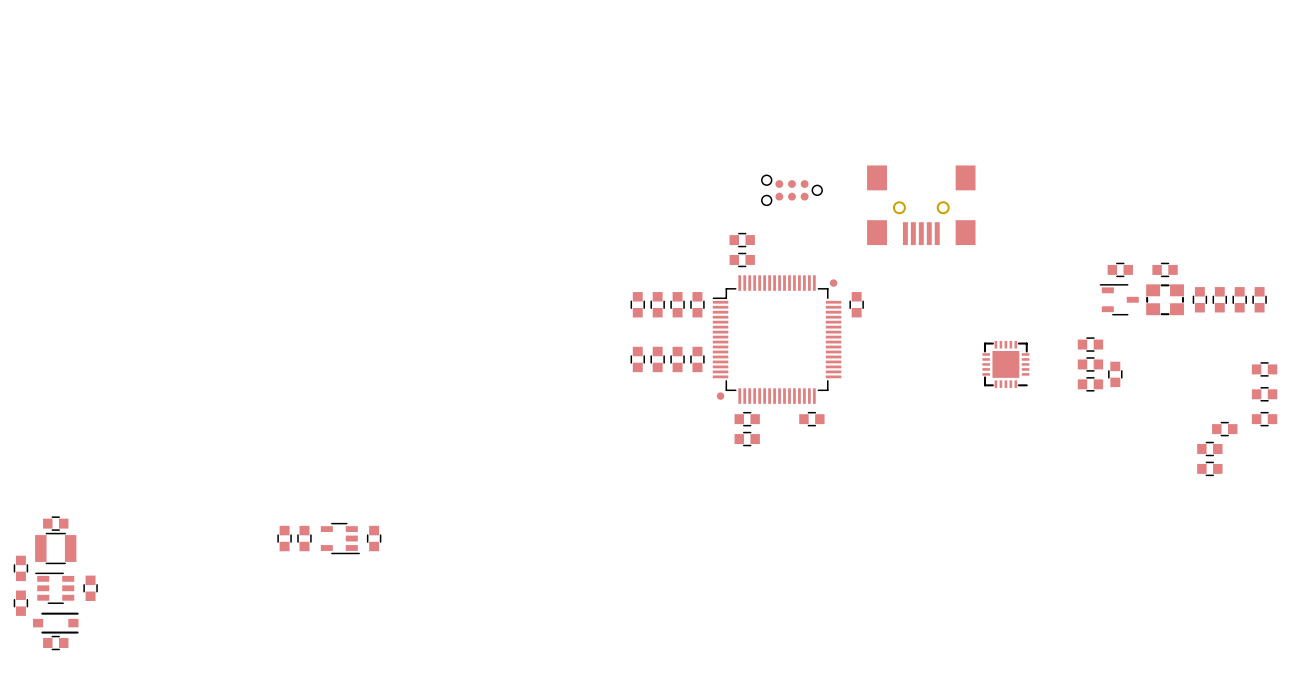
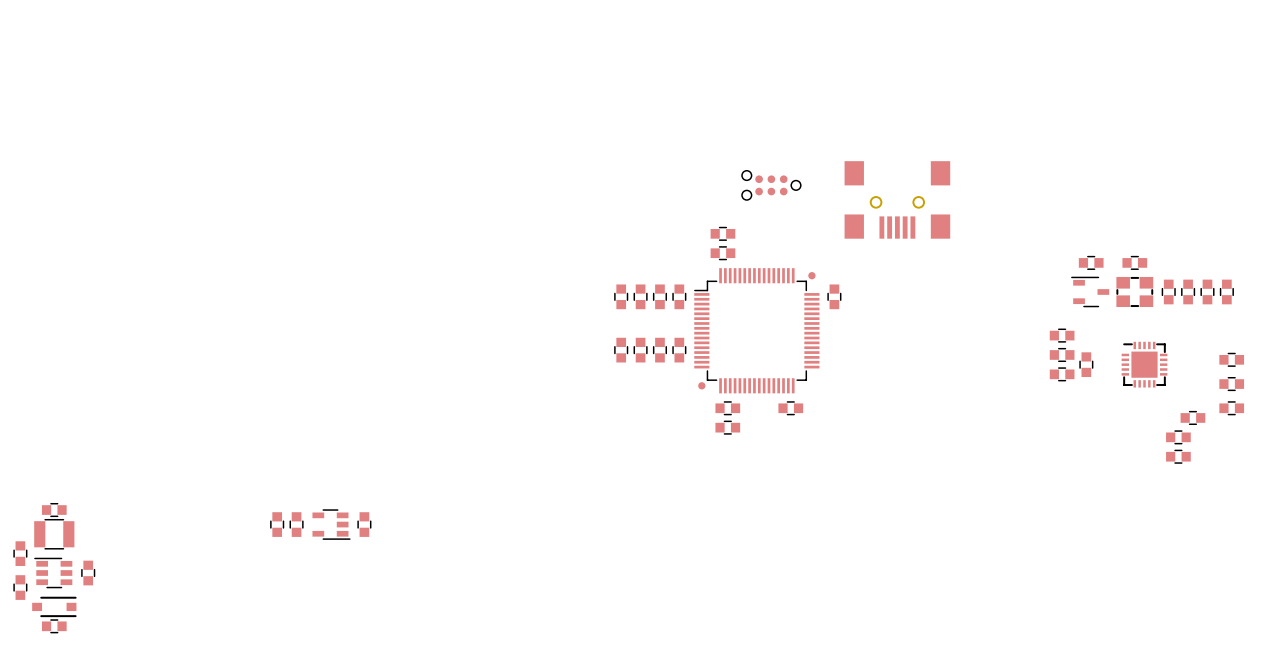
part rotation: 0° (1005, 364) -> 180° (1144, 364)
part position: (1005, 364) -> (1144, 364)

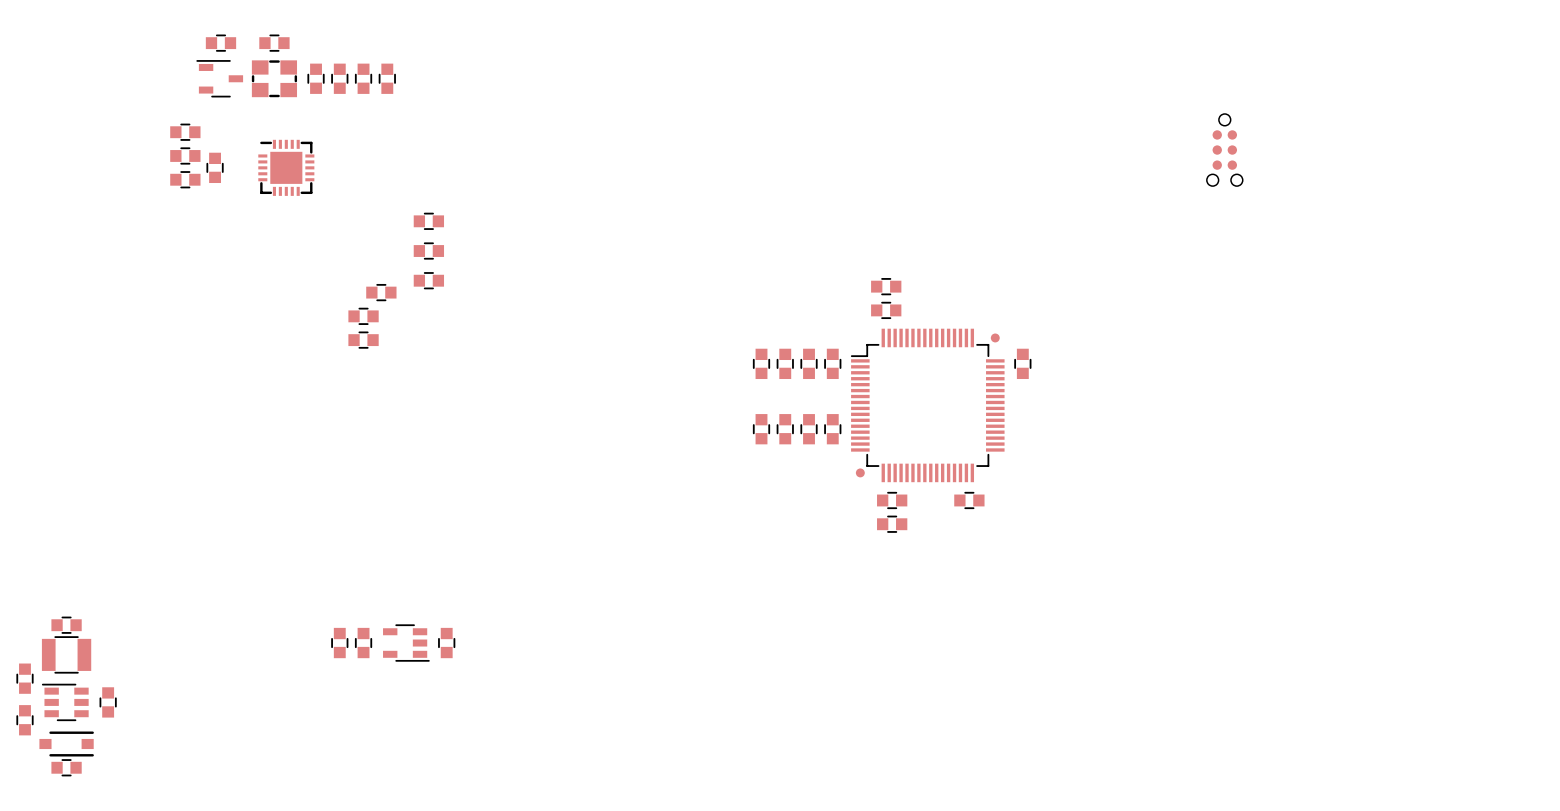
part: none -> (220, 43)
part: none -> (274, 43)
part: none -> (219, 78)
part: none -> (274, 78)
part: none -> (316, 78)
part: none -> (339, 78)
part: none -> (363, 78)
part: none -> (387, 78)
part: none -> (185, 132)
part: none -> (185, 155)
part: none -> (215, 167)
part: none -> (286, 167)
part: none -> (185, 179)
part: none -> (428, 221)
part rotation: 0° (771, 185) -> 90° counterclockwise (1224, 150)
part position: (771, 185) -> (1224, 150)
part: (897, 199) -> none
part: none -> (428, 251)
part: none -> (428, 280)
part: none -> (381, 292)
part: none -> (363, 316)
part: (1091, 262) -> none
part: (1134, 262) -> none
part: none -> (363, 340)
part: (1090, 291) -> none
part: (1134, 291) -> none
part: (1168, 291) -> none
part: (1188, 291) -> none
part: (1207, 291) -> none
part: (1226, 291) -> none
part: (1062, 335) -> none
part: (1062, 354) -> none
part: (1231, 359) -> none
part: (1086, 364) -> none
part: (1144, 364) -> none
part: (1062, 374) -> none
part: (1231, 384) -> none
part: (1231, 408) -> none
part: (1192, 417) -> none
part: (1178, 437) -> none
part: (1178, 456) -> none

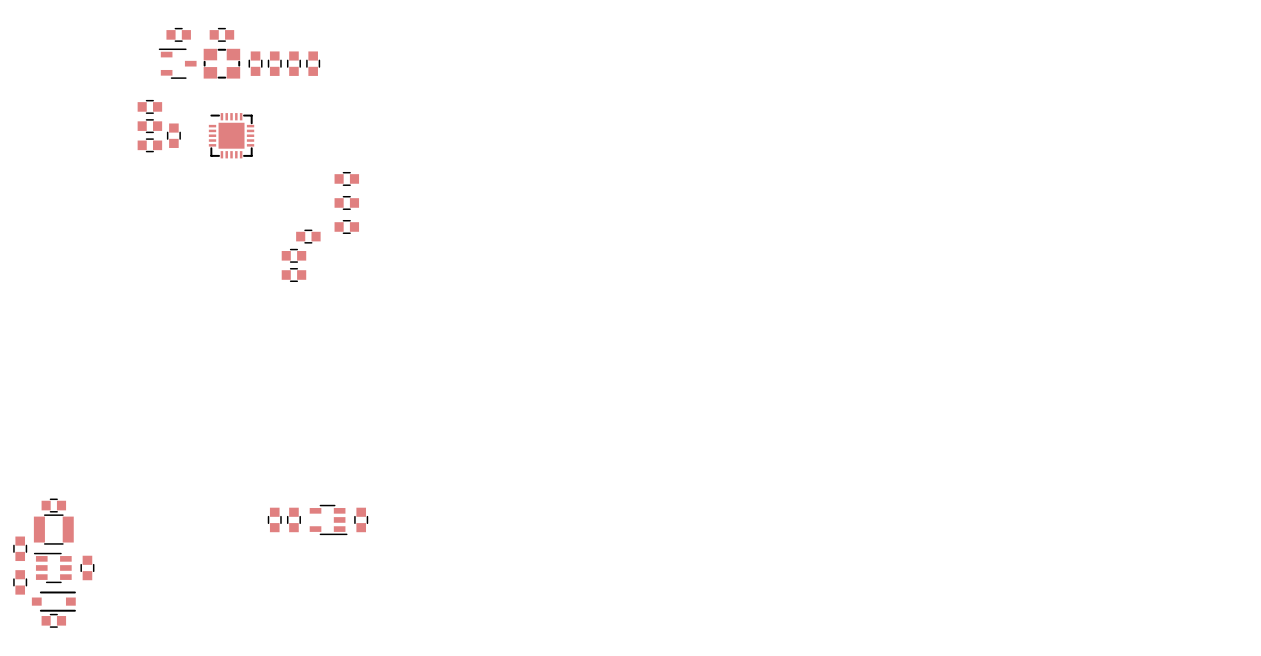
part: (1224, 150) -> none
part: (886, 286) -> none
part: (886, 310) -> none
part: (761, 363) -> none
part: (785, 363) -> none
part: (809, 363) -> none
part: (832, 363) -> none
part: (1022, 363) -> none
part: (927, 405) -> none
part: (761, 429) -> none
part: (785, 429) -> none
part: (809, 429) -> none
part: (832, 429) -> none
part: (892, 500) -> none
part: (969, 500) -> none
part: (892, 524) -> none

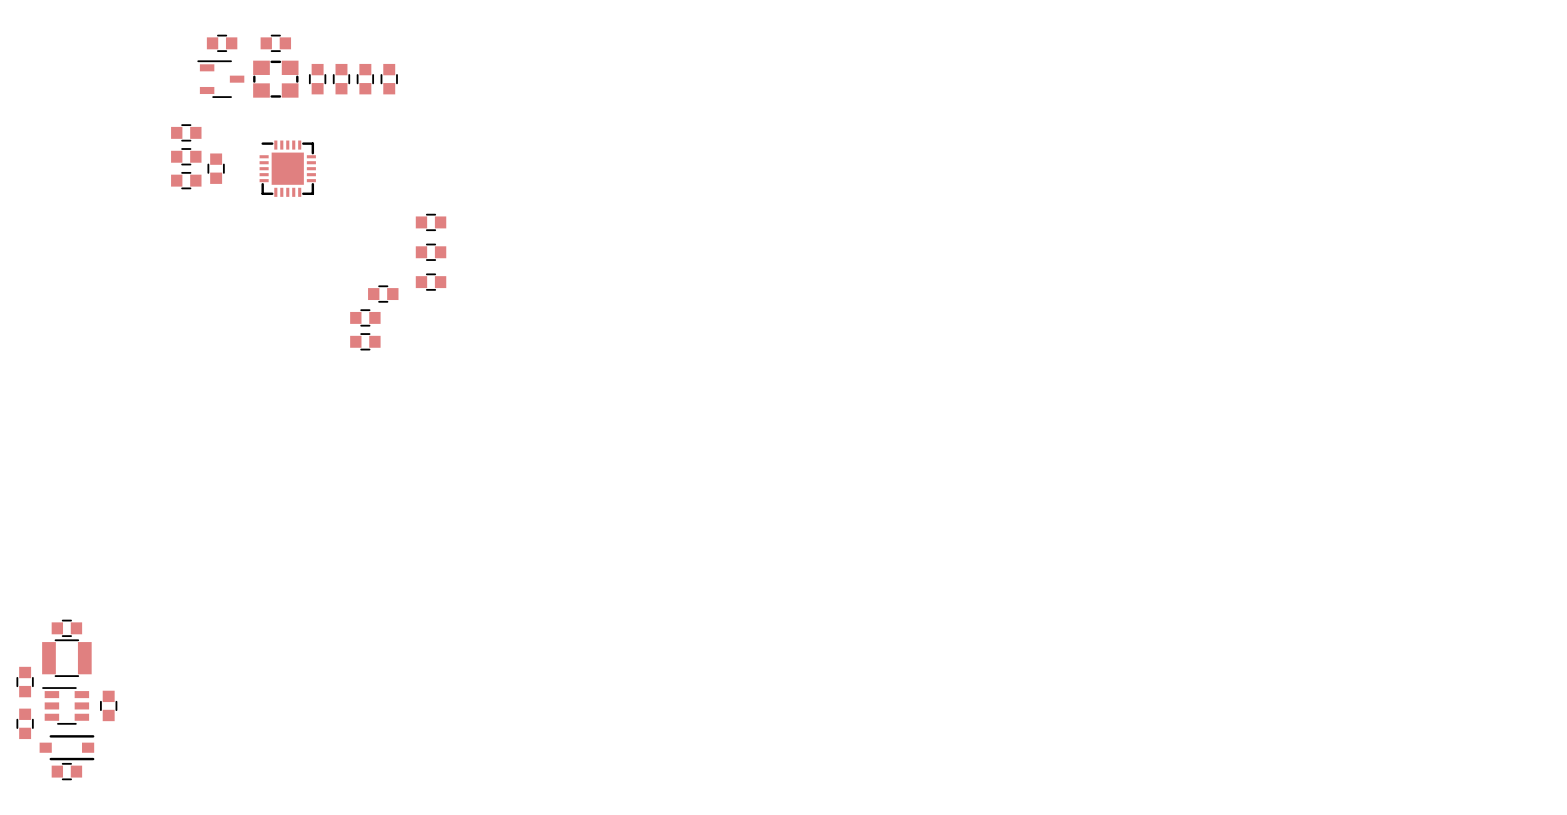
part: (274, 519) -> none
part: (293, 519) -> none
part: (328, 519) -> none
part: (361, 519) -> none

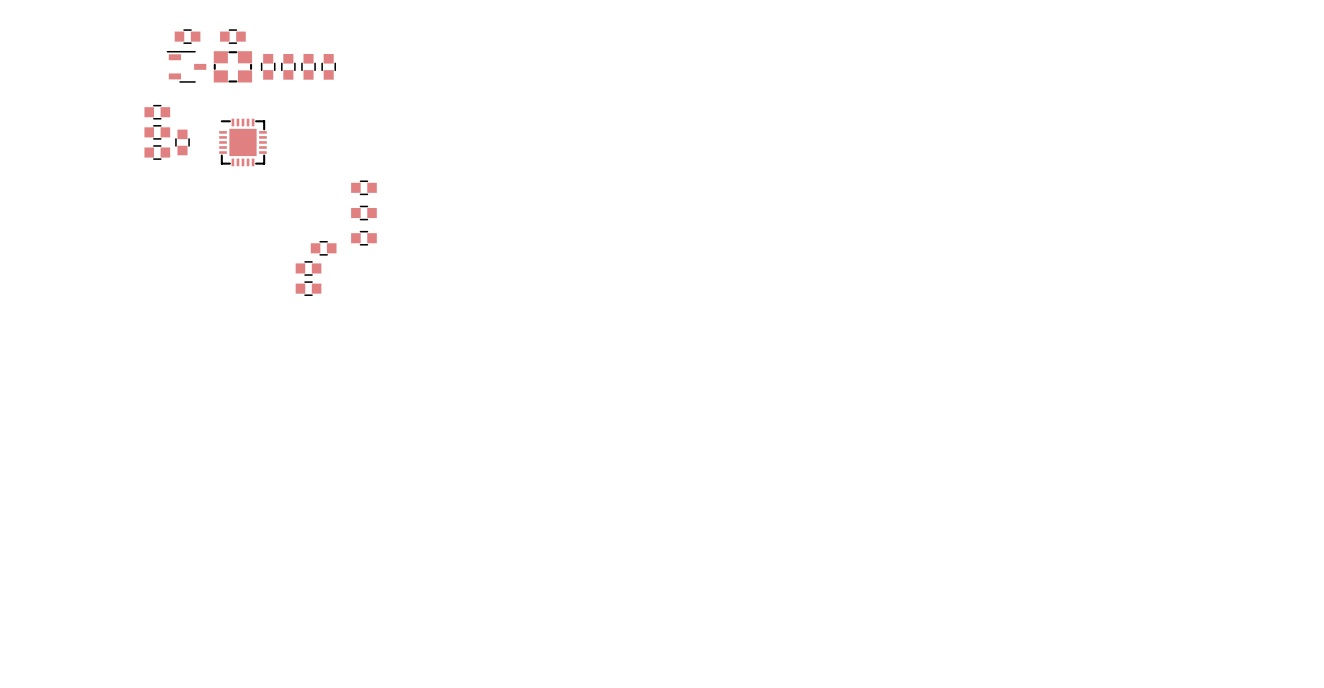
part: (66, 628) -> none
part: (66, 658) -> none
part: (25, 682) -> none
part: (65, 705) -> none
part: (108, 705) -> none
part: (25, 723) -> none
part: (66, 747) -> none
part: (66, 771) -> none

